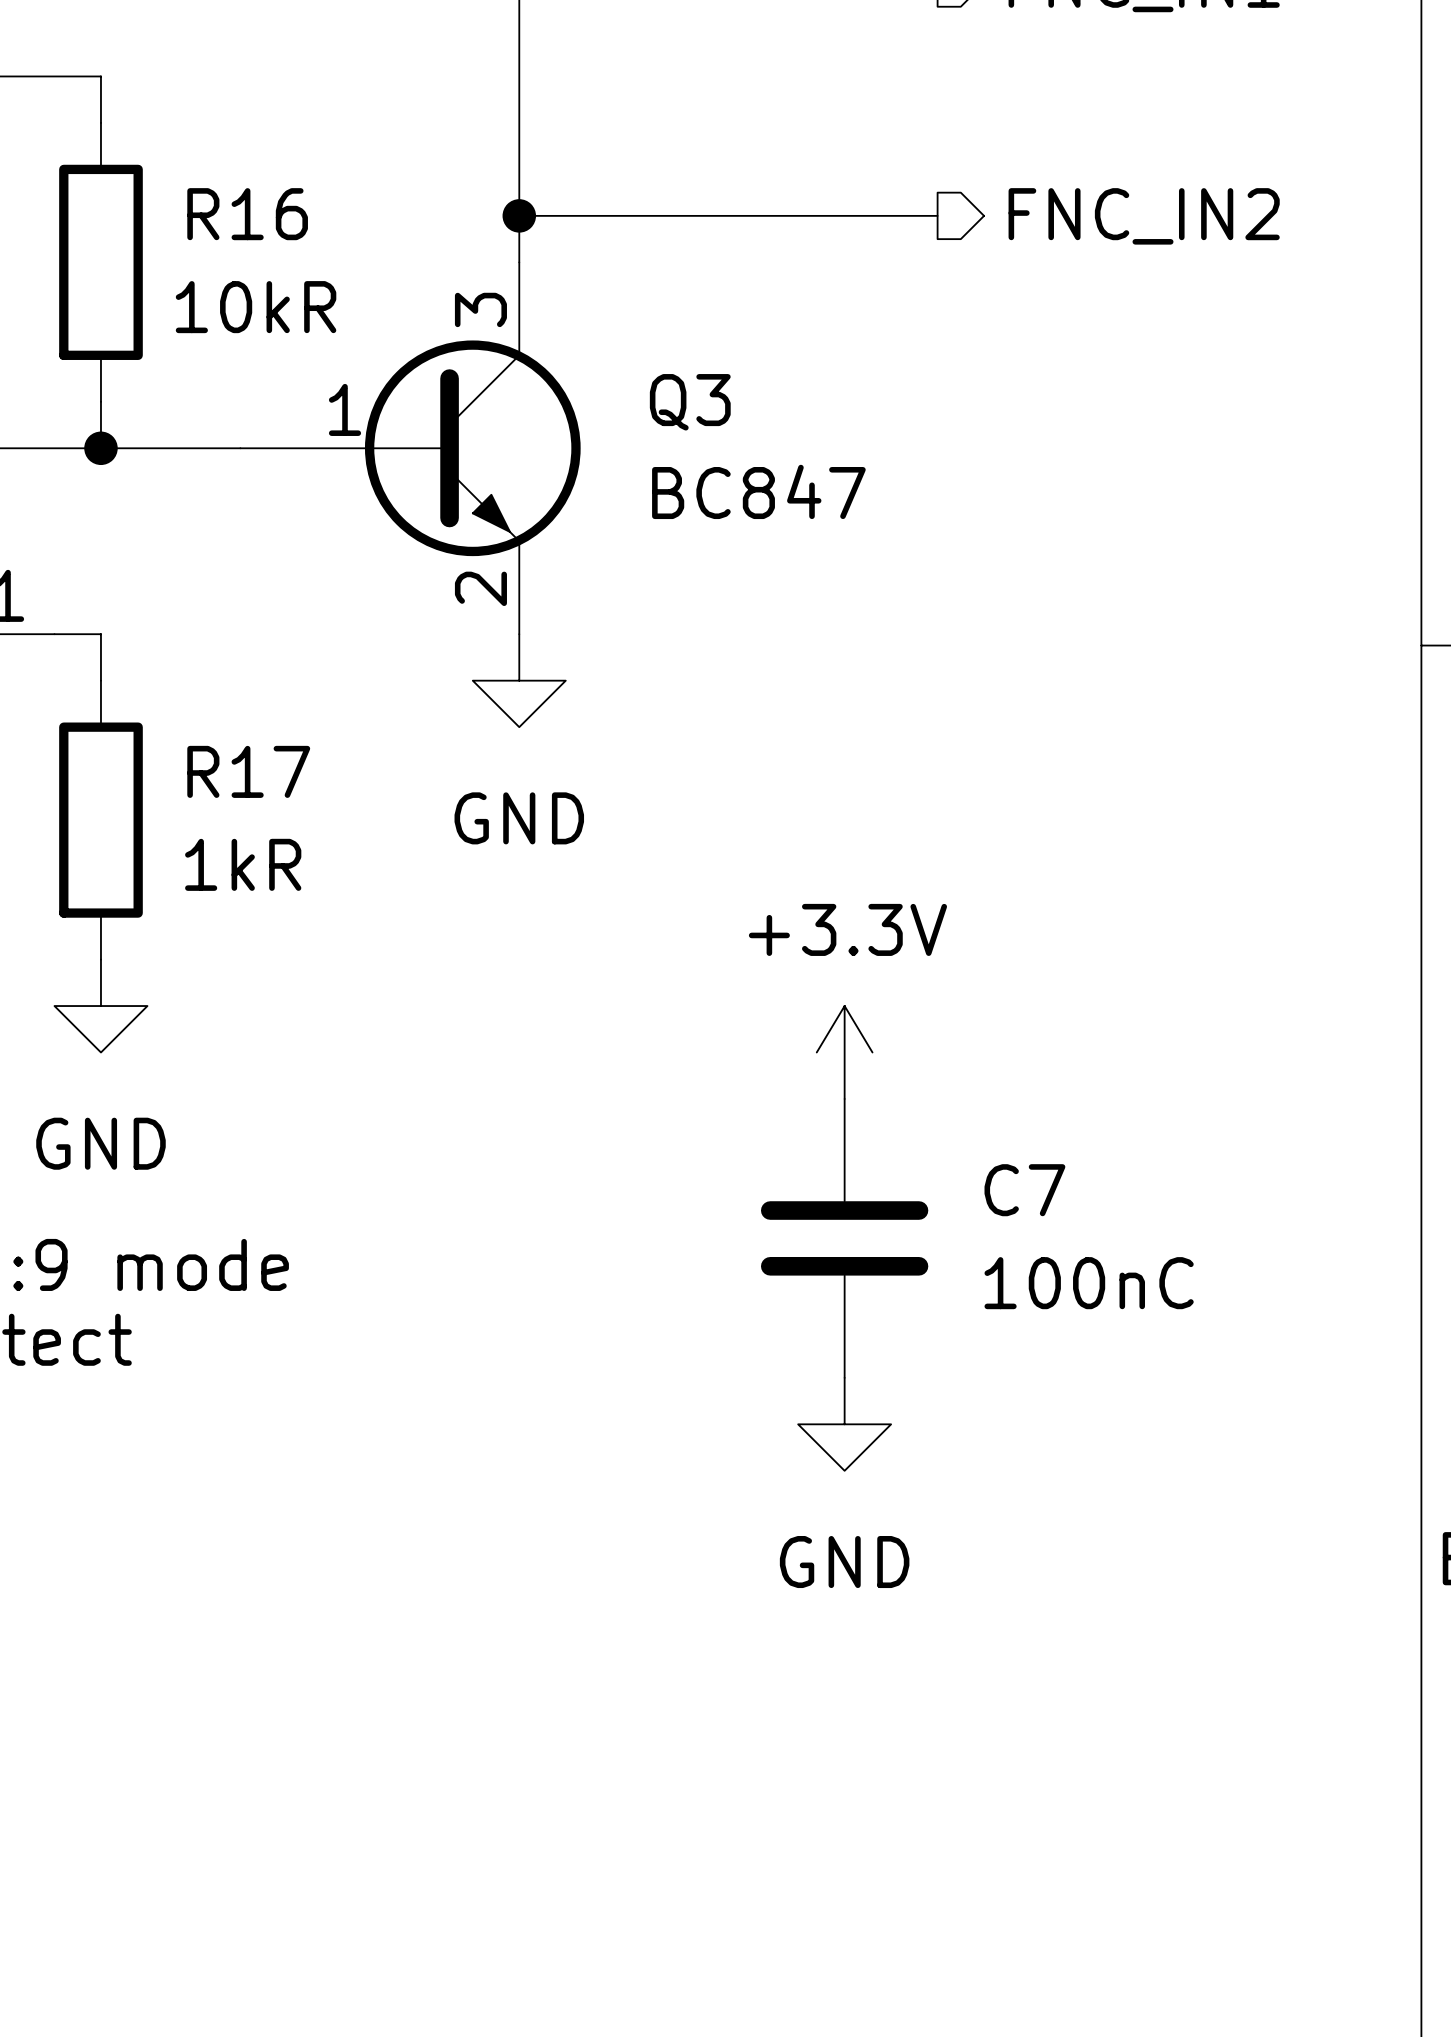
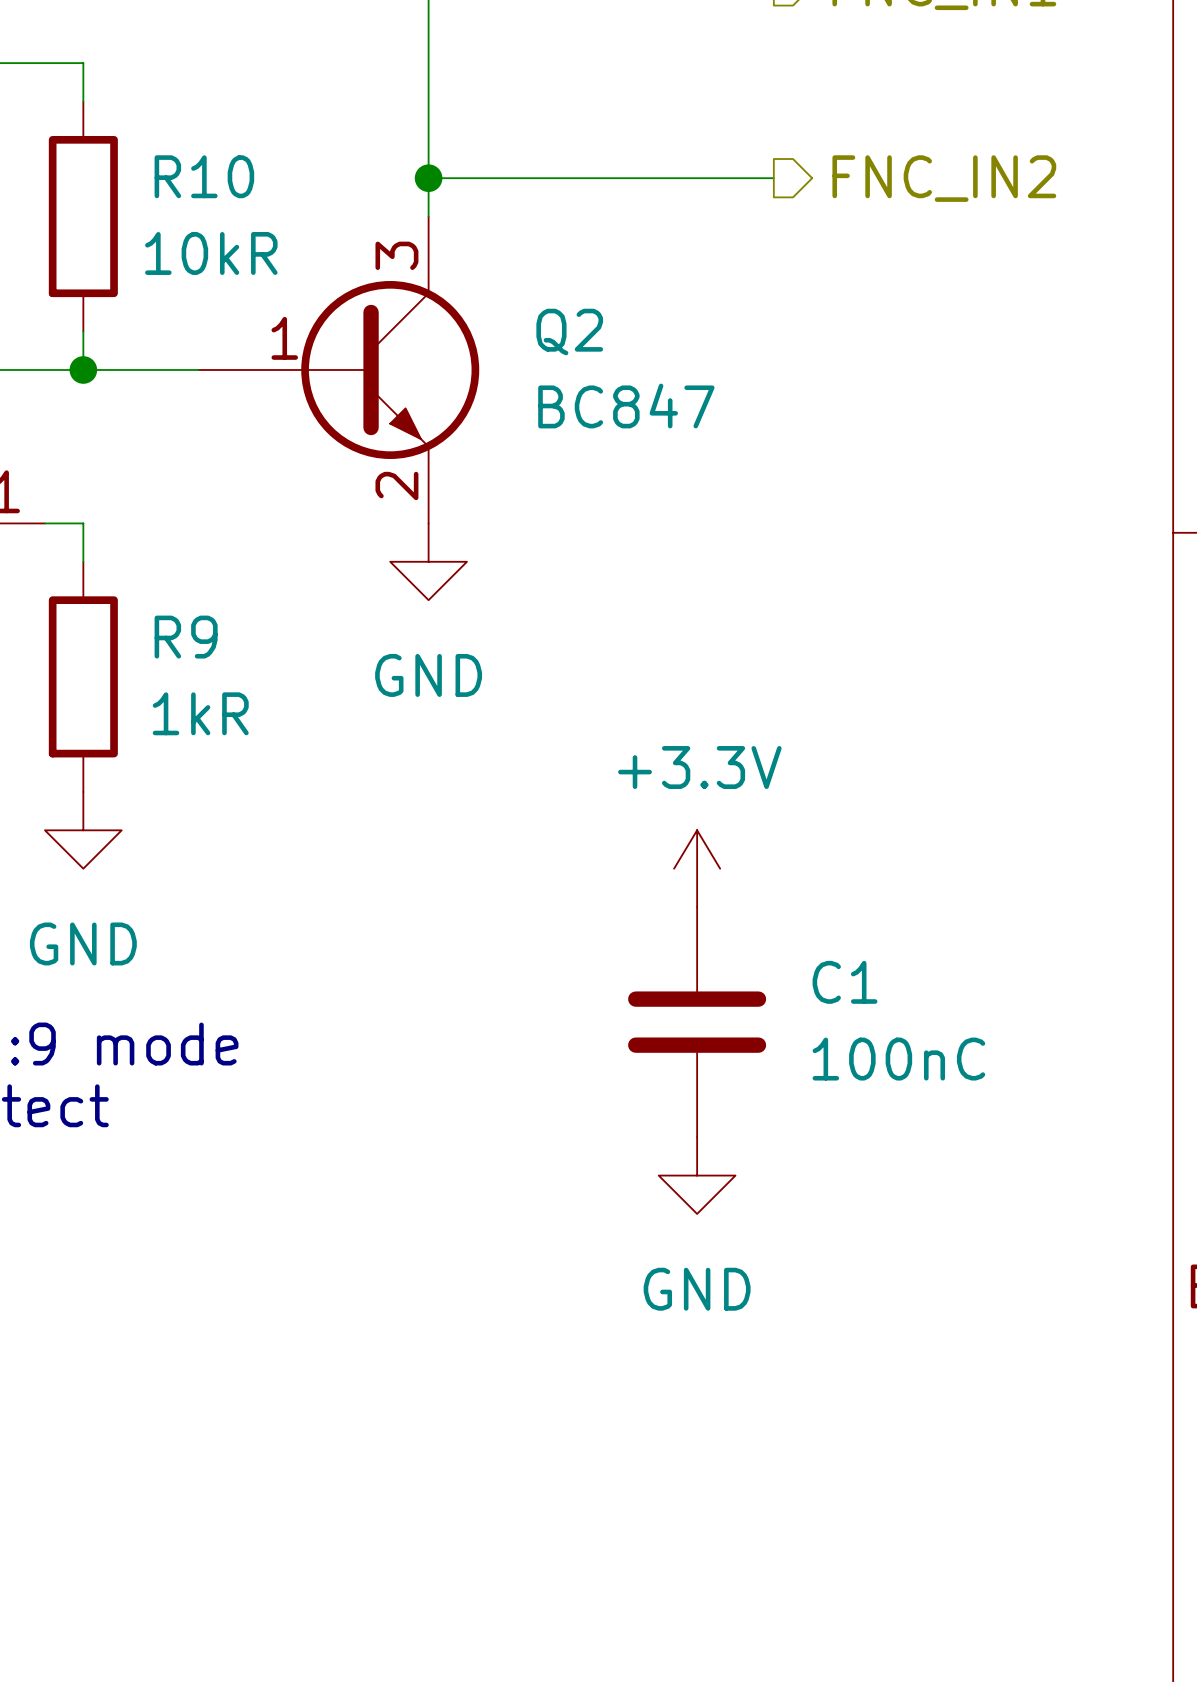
R16 name: R16 (247, 214) -> R10 (204, 176)
Q3 name: Q3 (690, 402) -> Q2 (569, 332)
R17 name: R17 (248, 771) -> R9 (186, 637)
C7 name: C7 (1024, 1190) -> C1 (845, 982)

